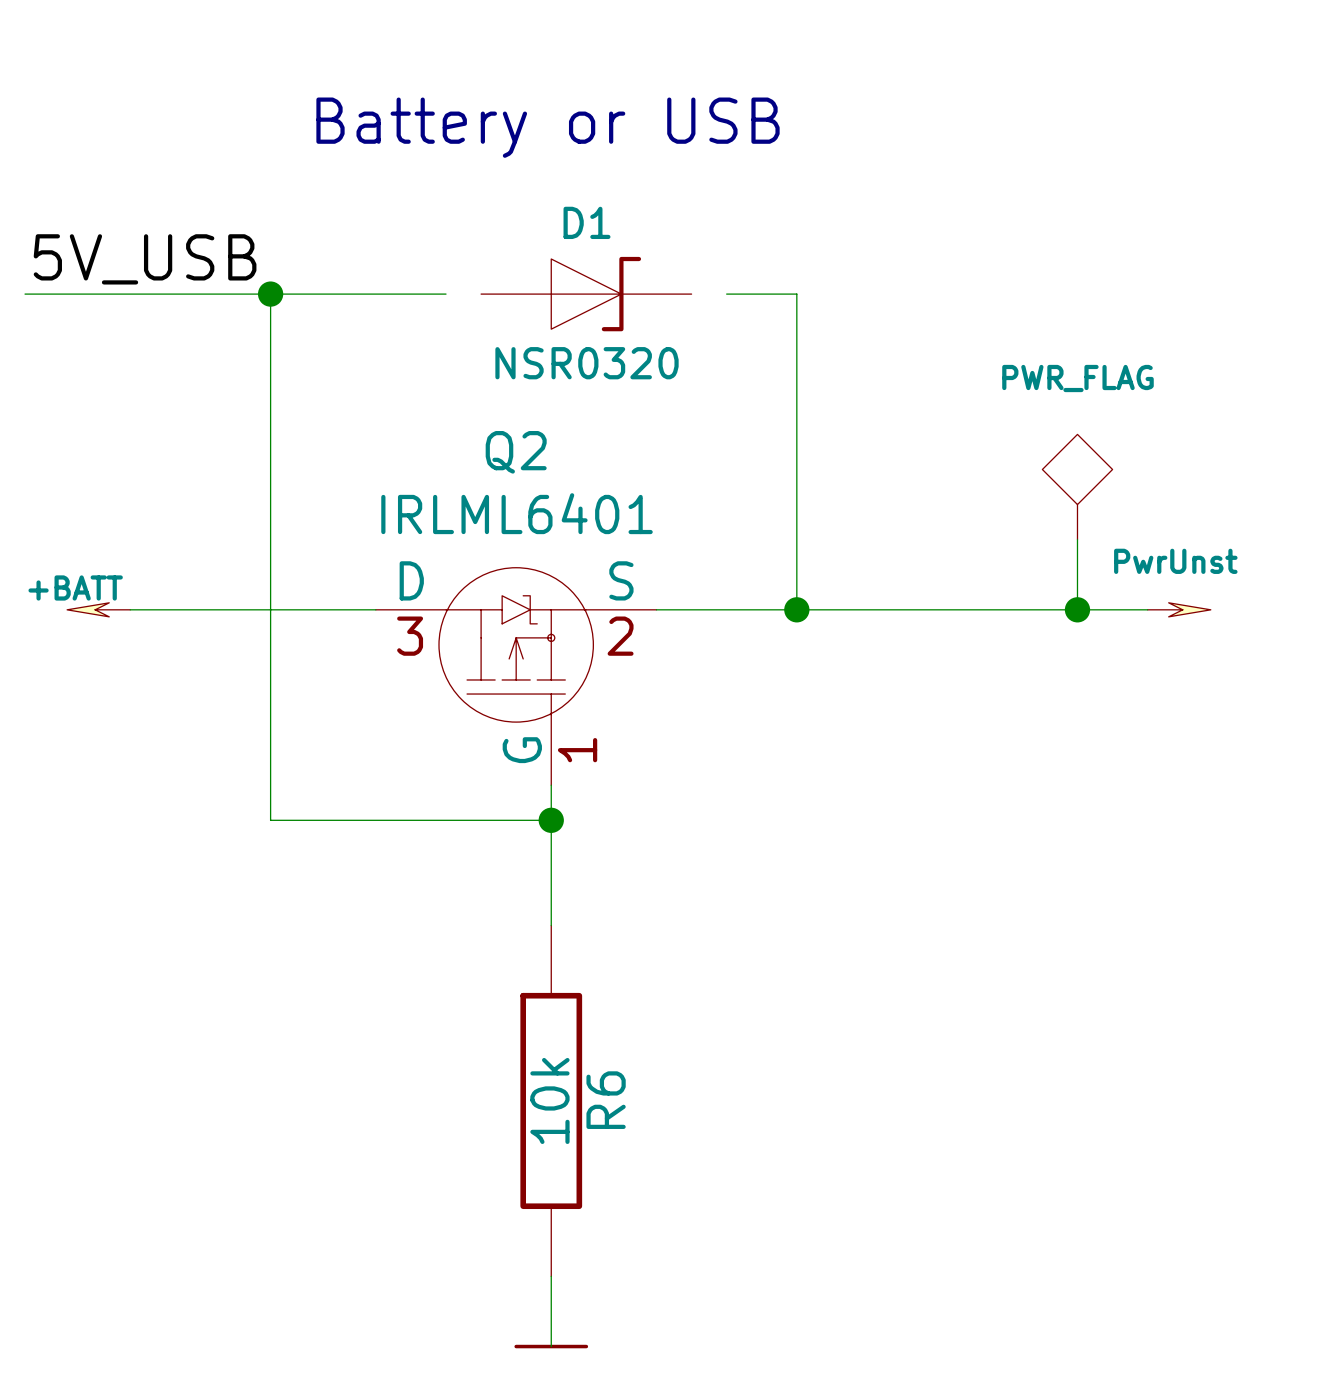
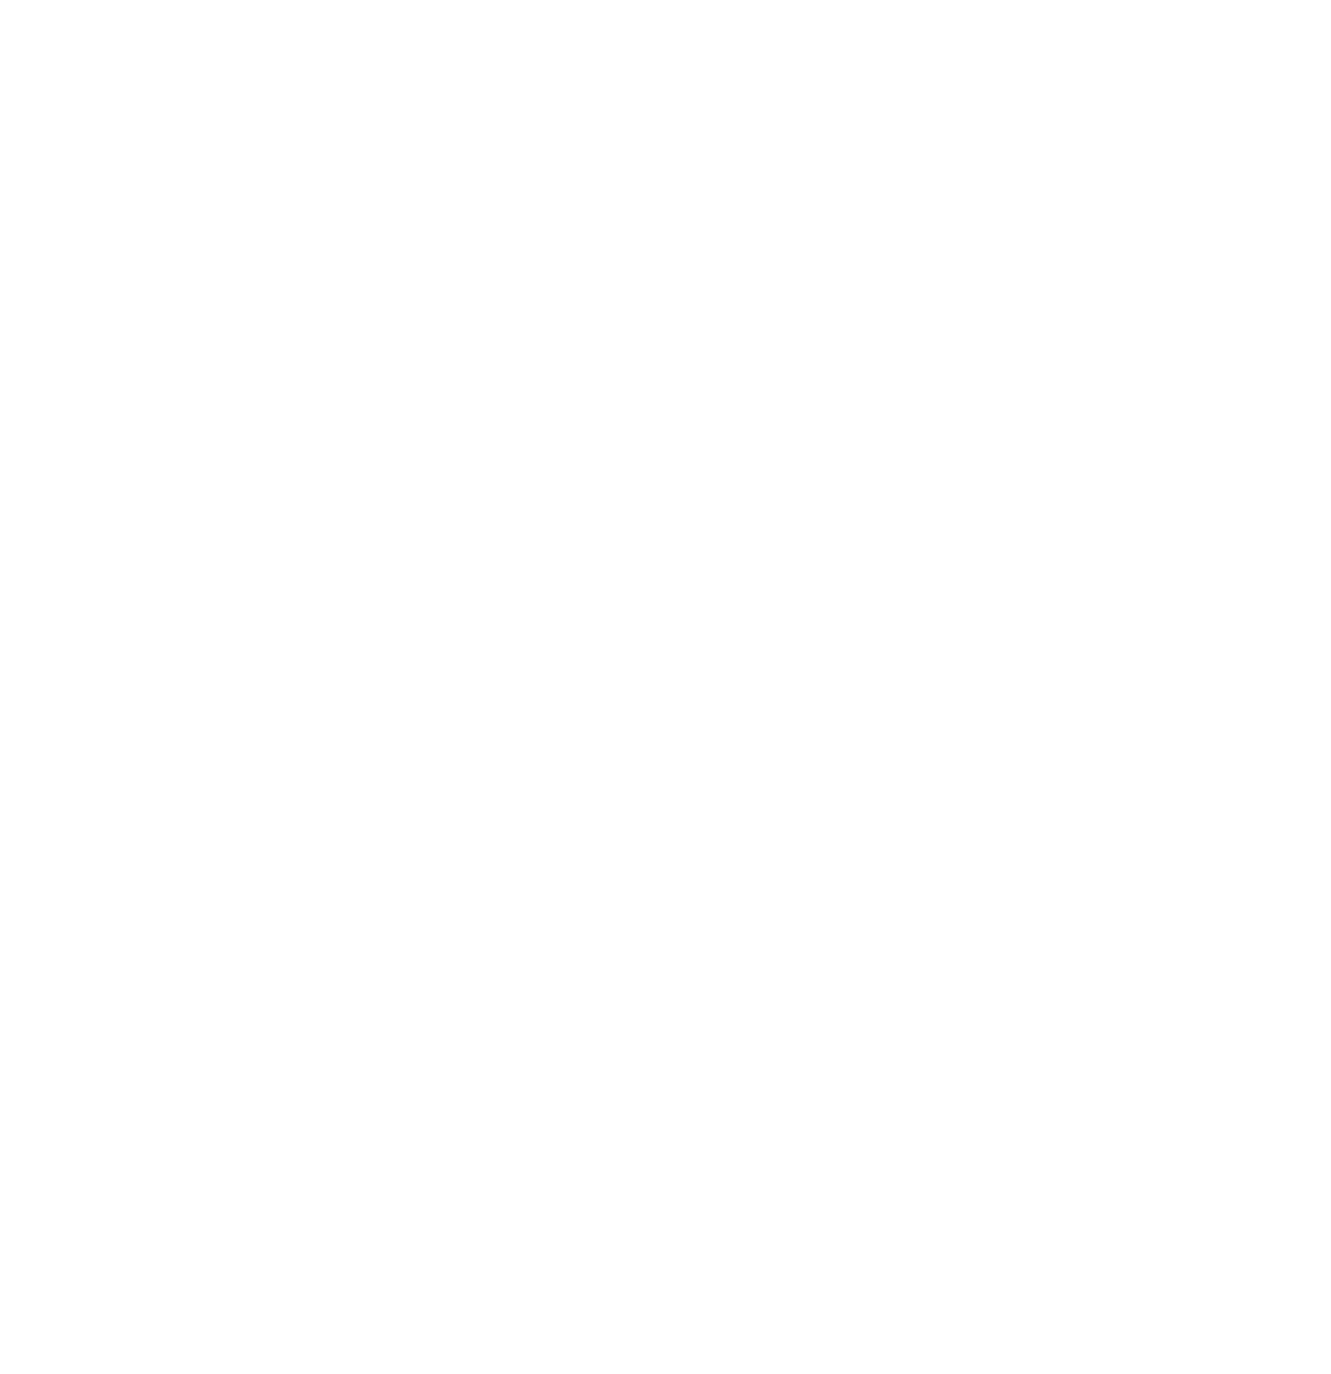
text: Battery or USB (548, 127) -> none
label: 5V_USB (145, 259) -> none
wire: (25, 294) (446, 294) -> none
wire: (270, 294) (270, 820) (551, 820) -> none
junction: (270, 294) -> none
D1: NSR0320 (586, 294) -> none
wire: (726, 294) (796, 294) (796, 609) -> none
power symbol: PWR_FLAG (1077, 487) -> none
wire: (1077, 539) (1077, 609) -> none
power symbol: +BATT (98, 609) -> none
wire: (130, 609) (375, 609) -> none
wire: (656, 609) (1147, 609) -> none
junction: (796, 609) -> none
junction: (1077, 609) -> none
power symbol: PwrUnst (1179, 609) -> none
Q2: IRLML6401 (516, 676) -> none
wire: (551, 785) (551, 925) -> none
junction: (551, 820) -> none
R6: 10k (551, 1100) -> none
wire: (551, 1276) (551, 1346) -> none
power symbol: (551, 1346) -> none

